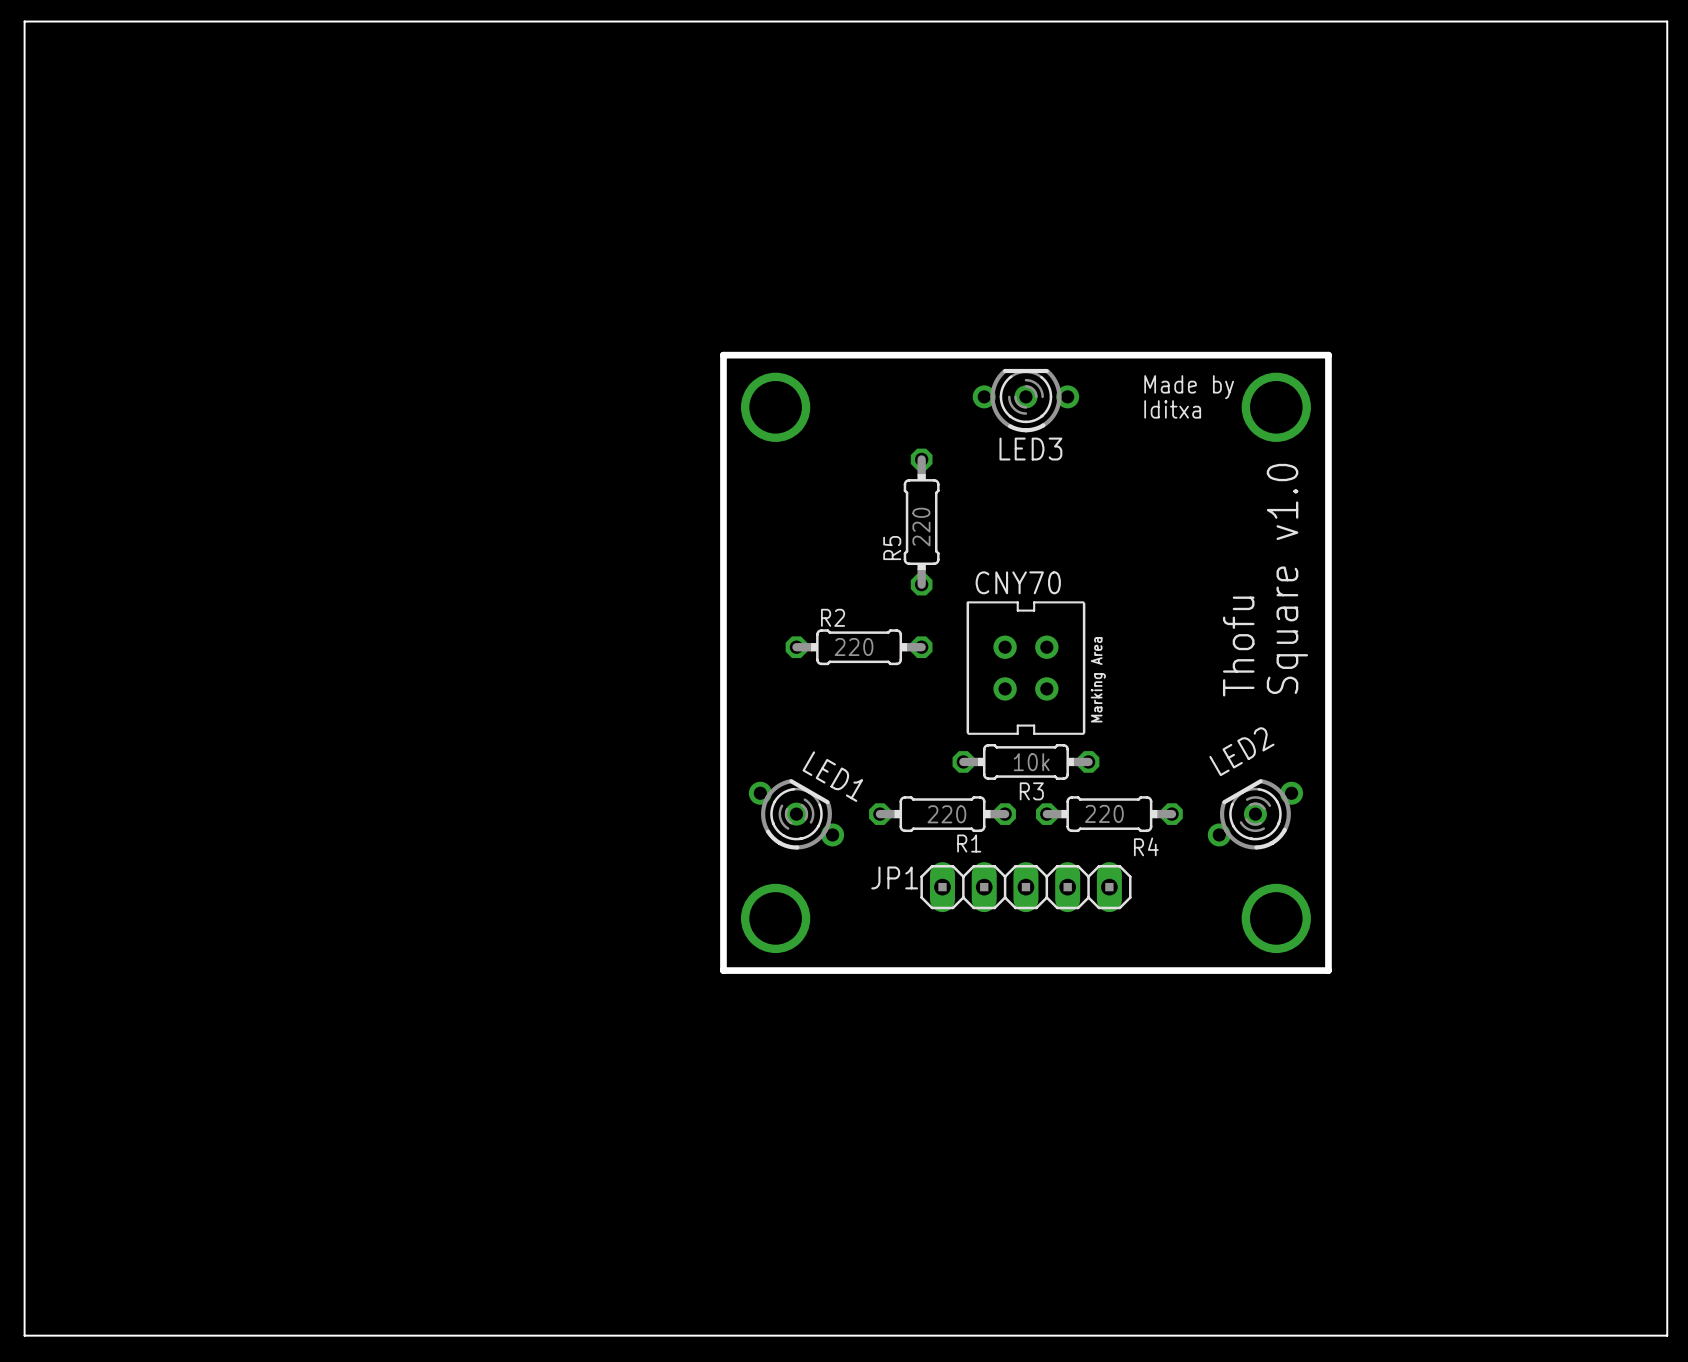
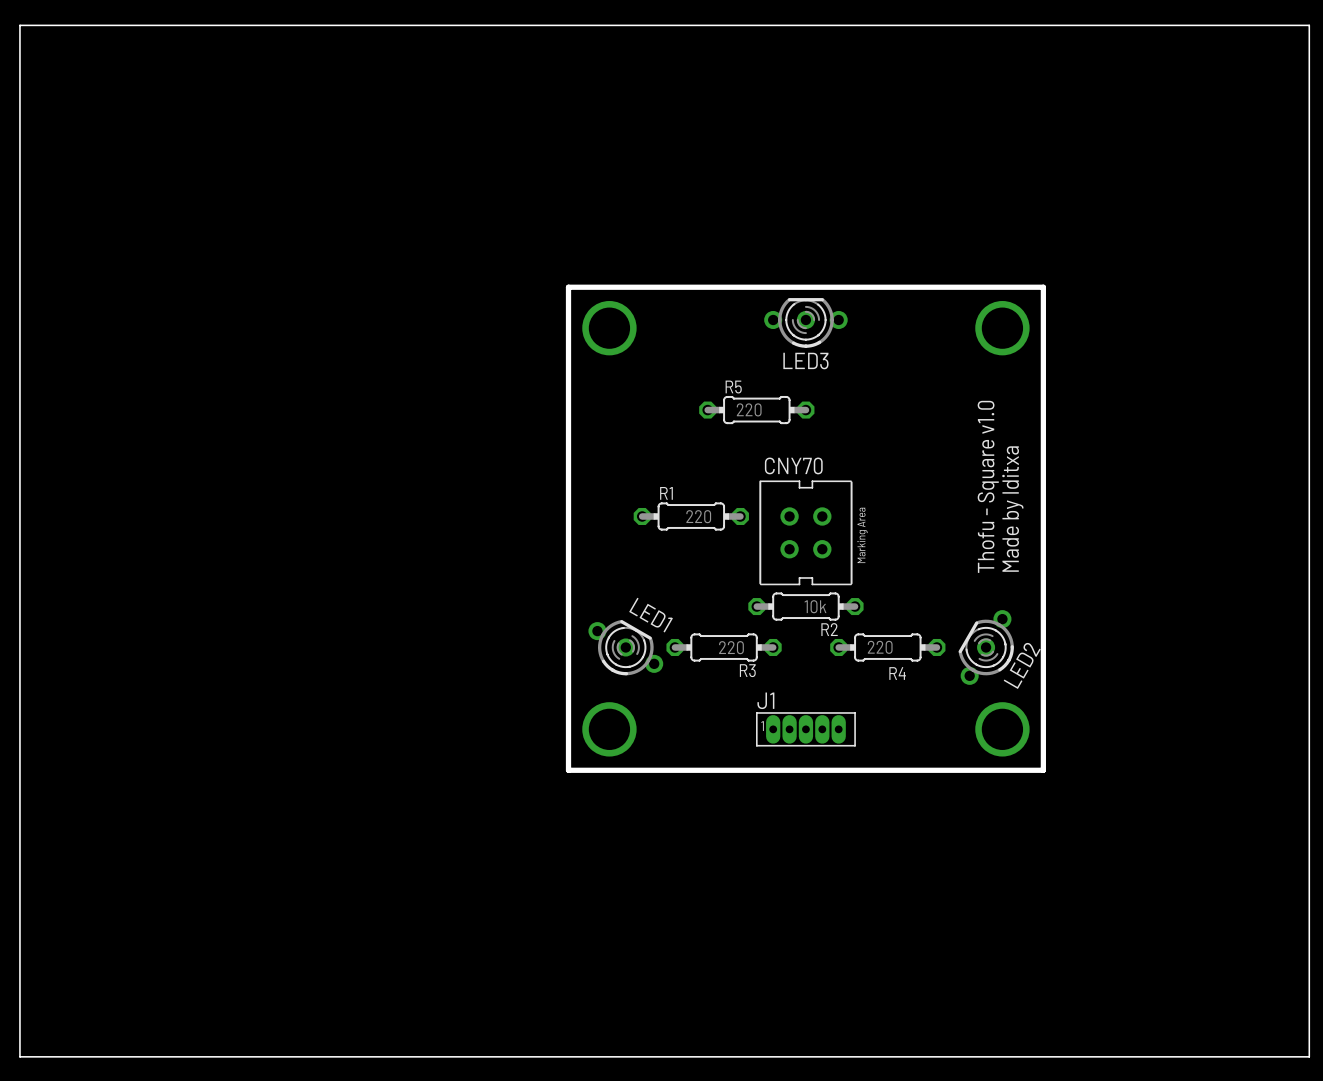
text: Made by (1189, 387) -> none
text: Iditxa (1172, 409) -> none
R5 rotation: 0° (921, 522) -> 90° clockwise (756, 410)
text: Square v1.0 (1287, 578) -> Thofu - Square v1.0 (988, 486)
text: none -> Made by Iditxa (1012, 509)
text: Thofu (1238, 646) -> none
R2: 220 (859, 647) -> none
LED2 name position: LED2 (1241, 751) -> LED2 (1022, 665)
R3 name: R3 (1031, 791) -> R2 (829, 629)
R3: none -> 220 (724, 647)
R1 position: (942, 814) -> (691, 516)
R4 position: (1109, 814) -> (887, 647)
LED2 rotation: 0° (1255, 814) -> 30° counterclockwise (986, 647)
R1 name position: R1 (969, 843) -> R1 (666, 493)
JP1: (1025, 887) -> none
J1: none -> (805, 729)

